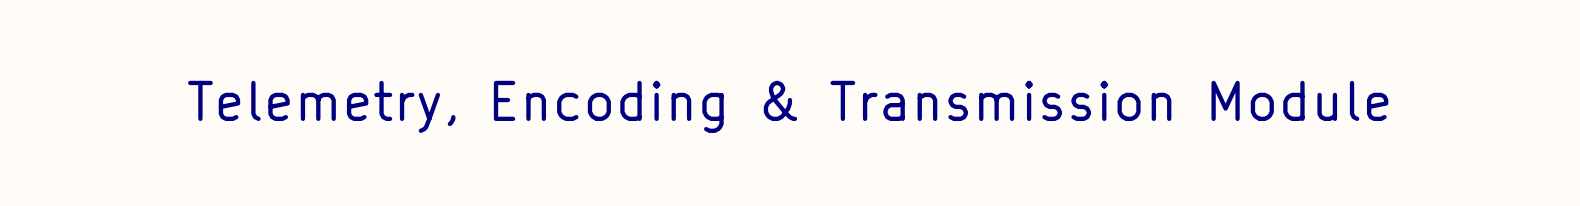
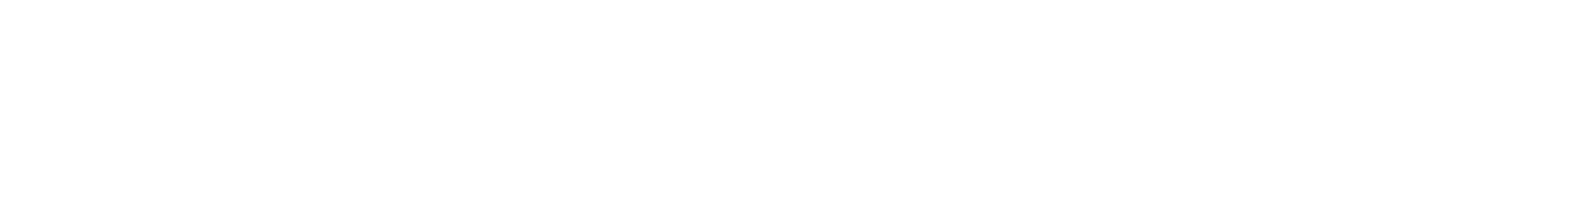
text: Telemetry, Encoding & Transmission Module (788, 106) -> none

